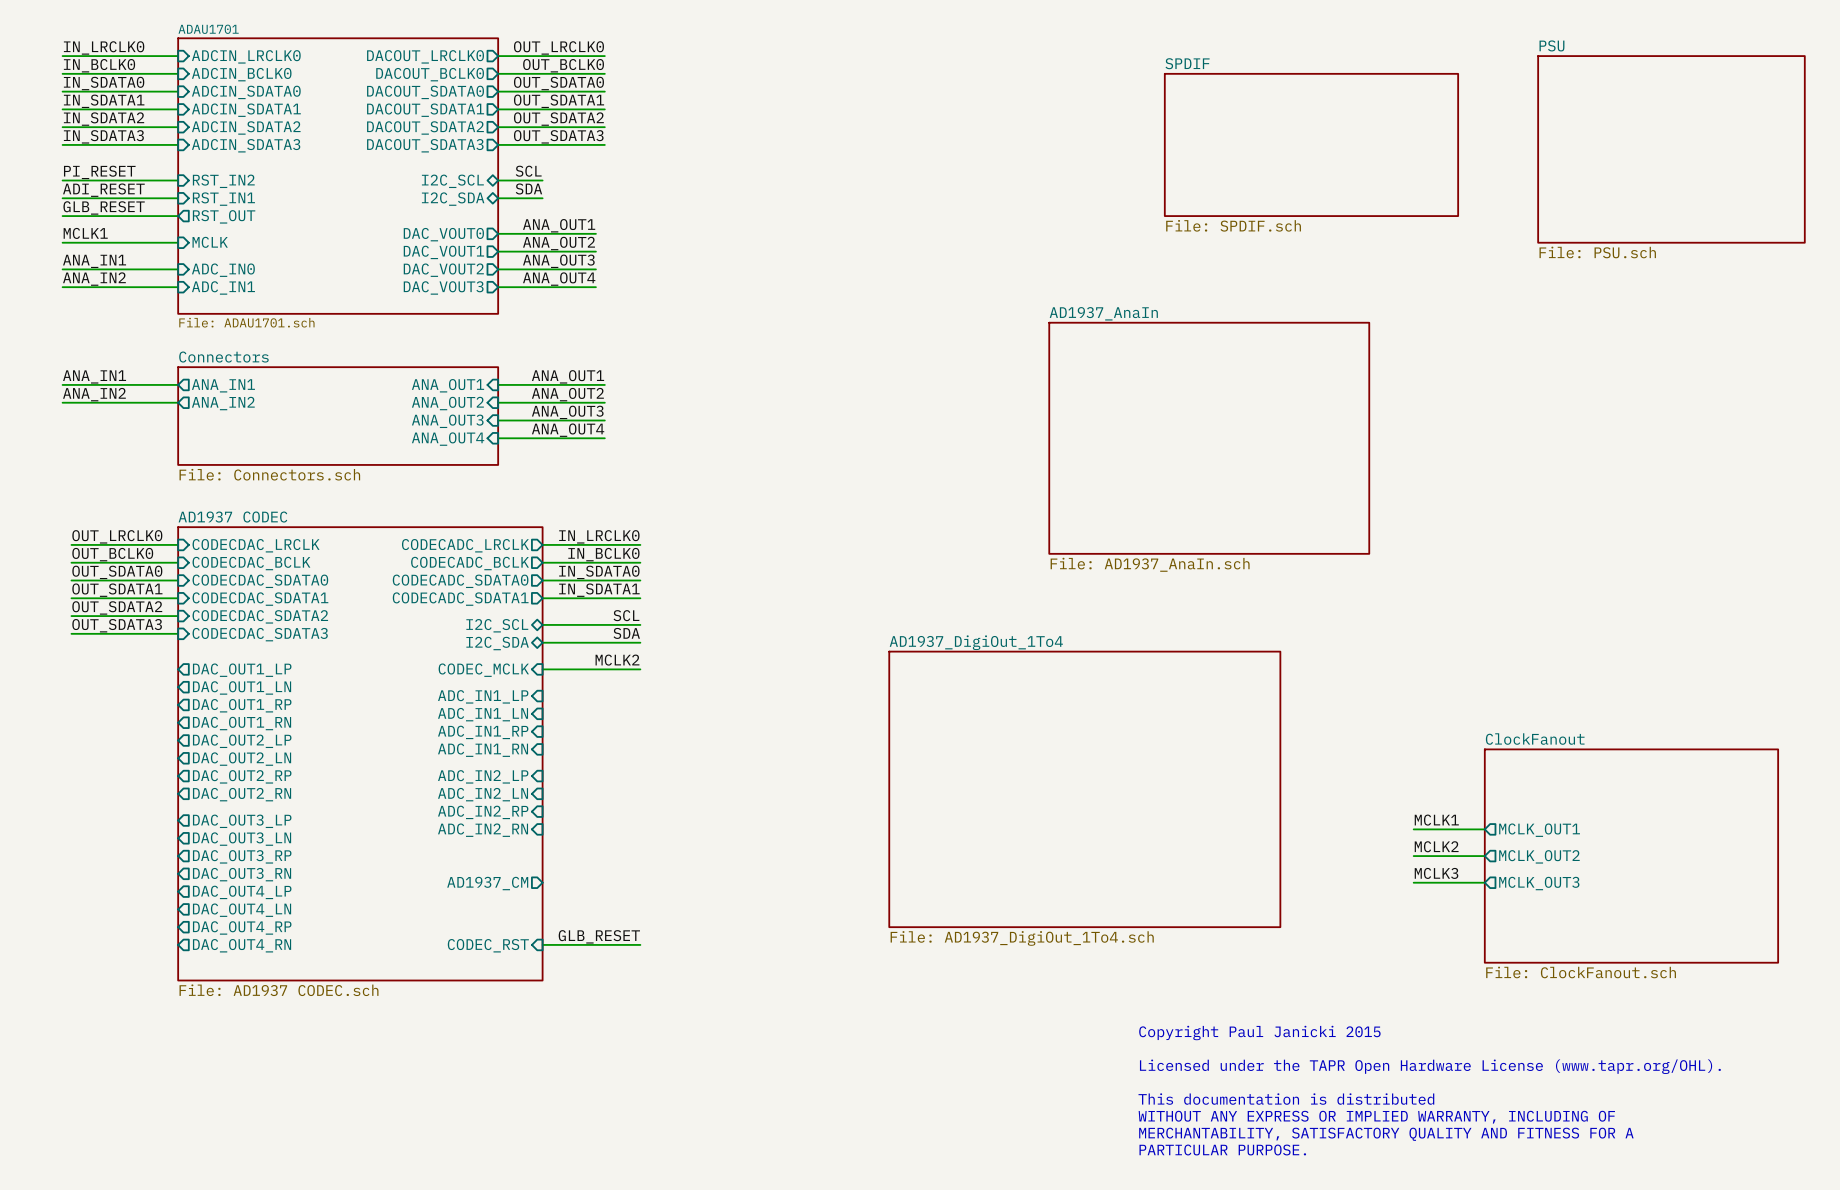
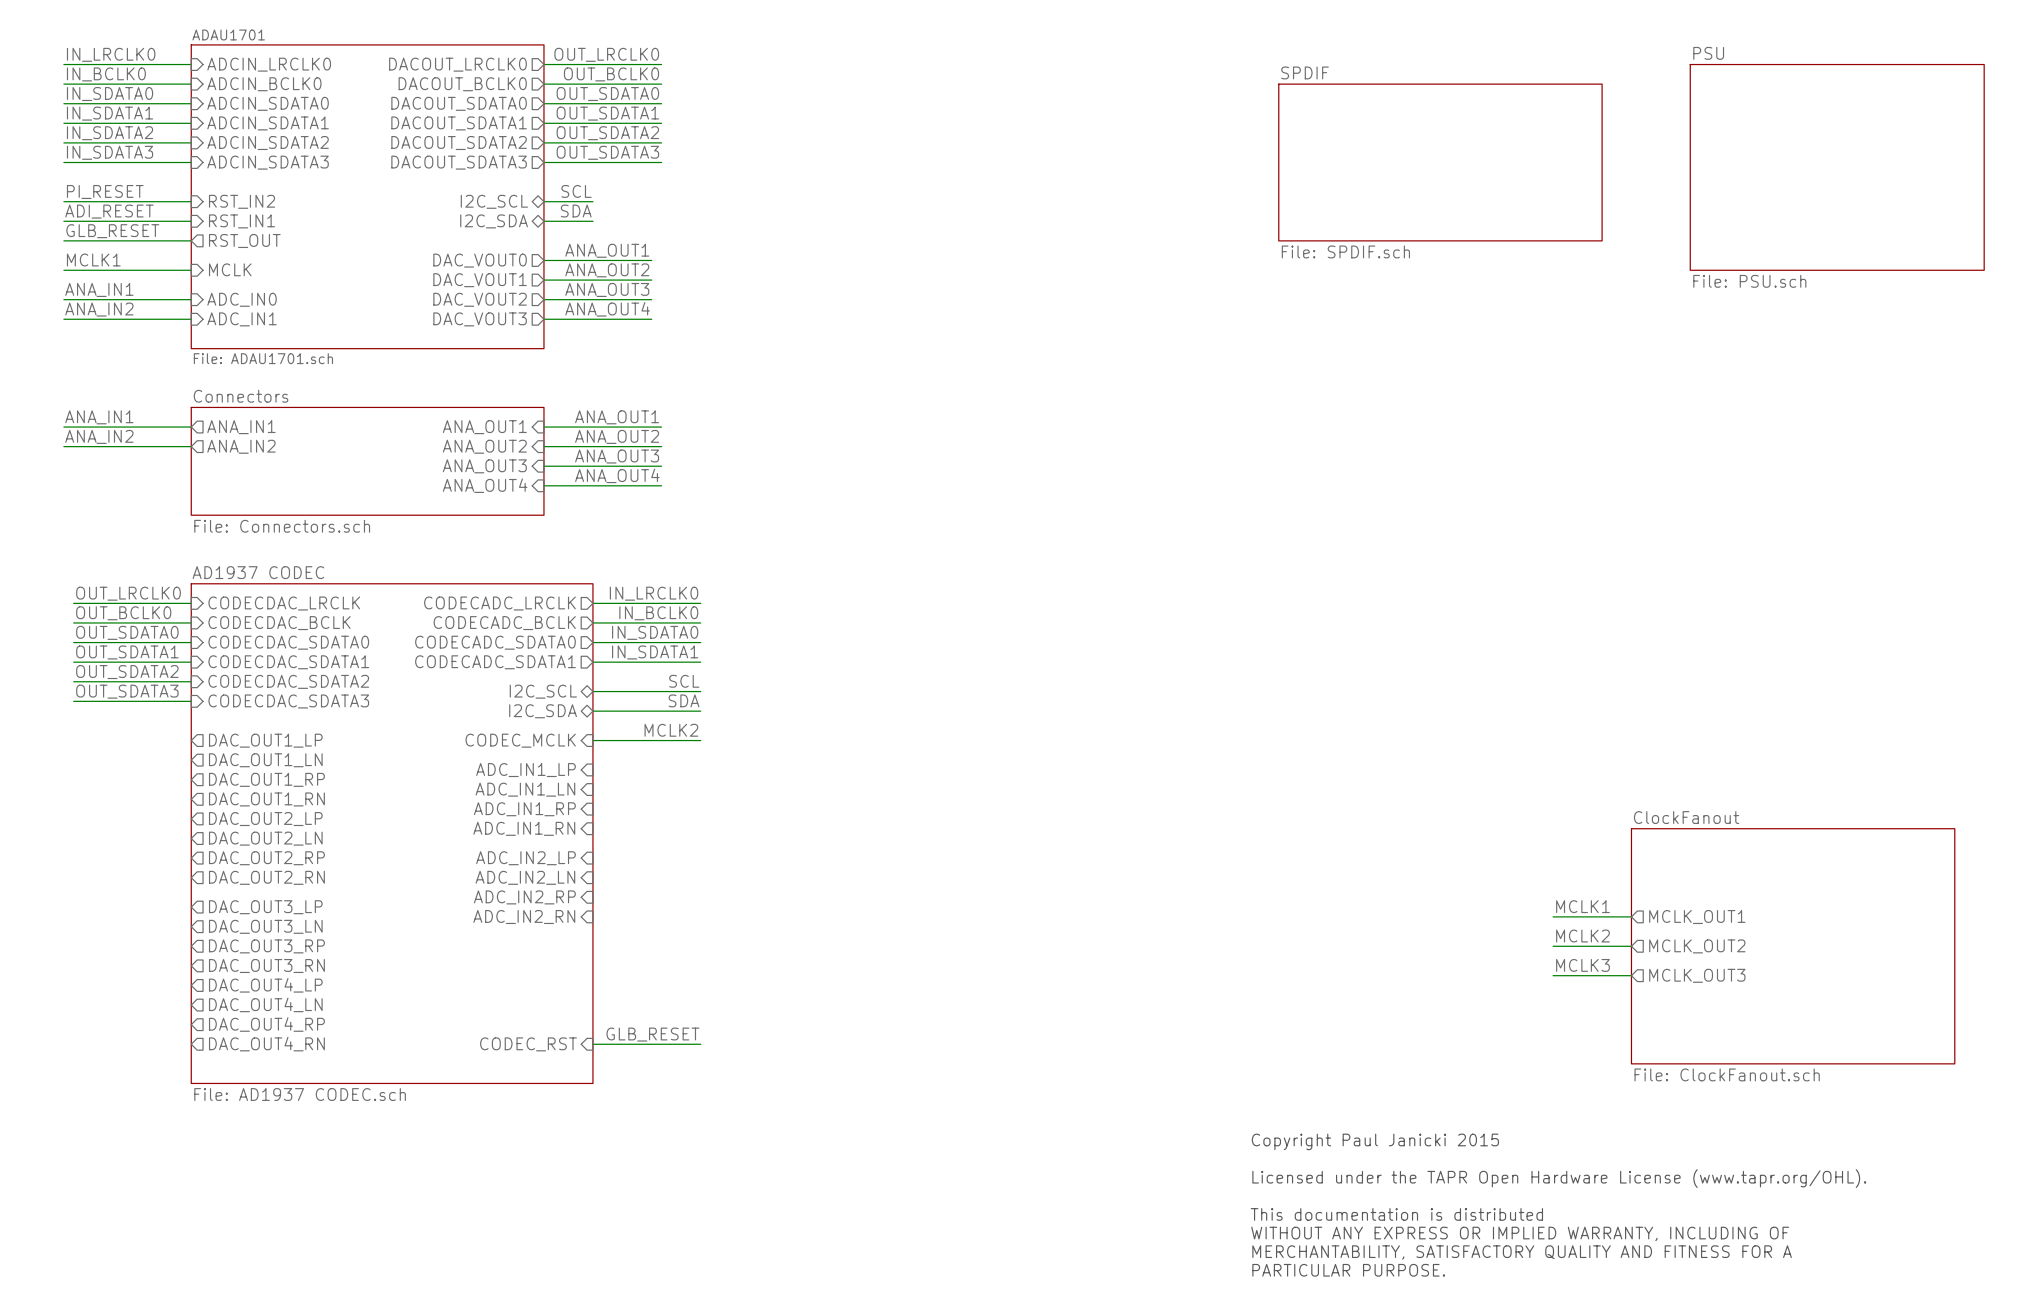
sheet AD1937_AnaIn: File: AD1937_AnaIn.sch (1209, 438) -> none
sheet AD1937_DigiOut_1To4: File: AD1937_DigiOut_1To4.sch (1084, 789) -> none
sheet pin: AD1937_CM (487, 883) -> none

